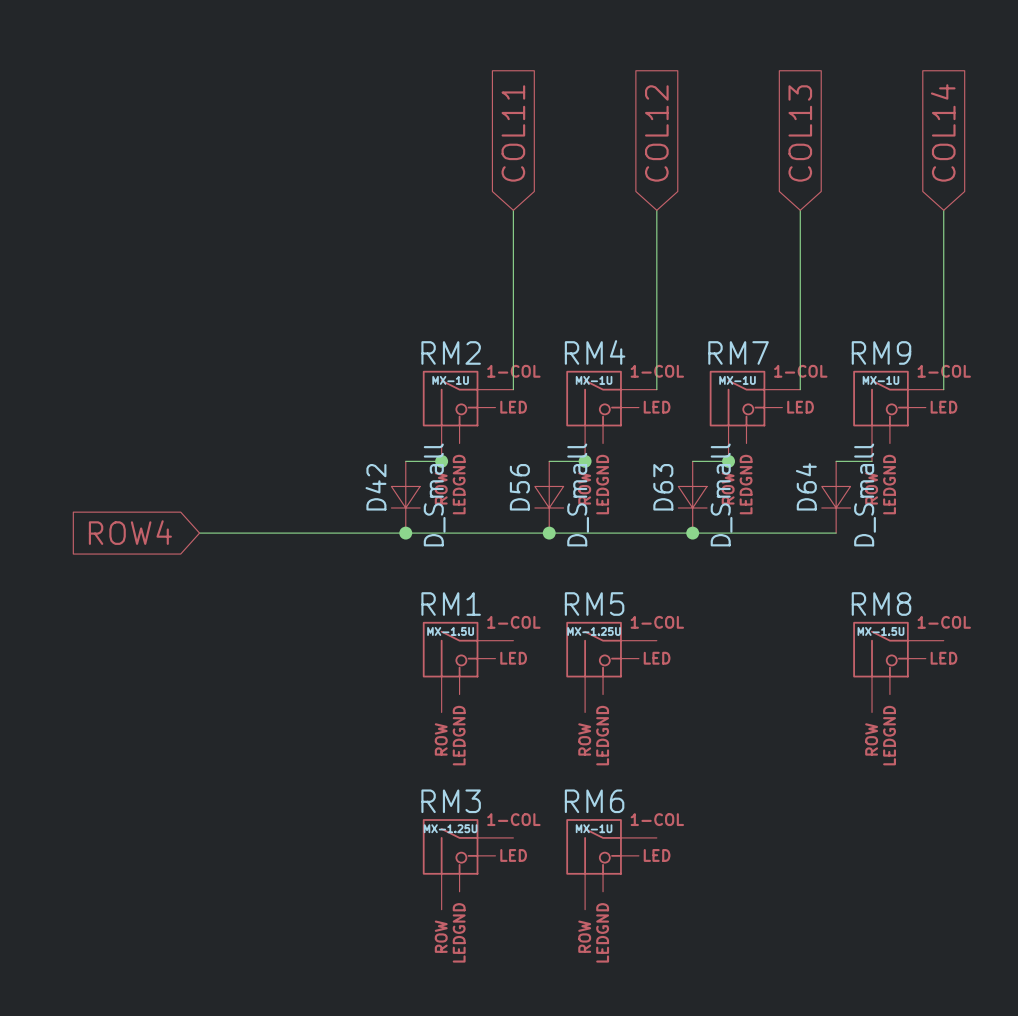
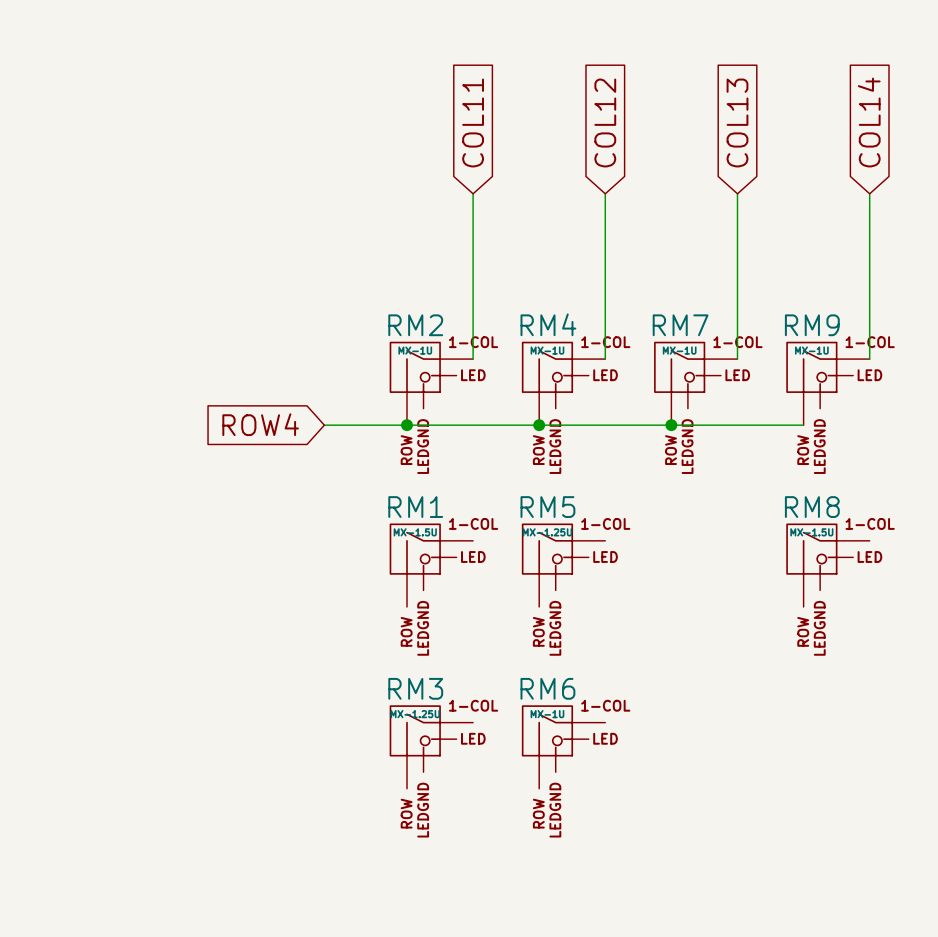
wire: none -> (324, 425) (373, 425)
wire: none -> (406, 425) (506, 425)
wire: none -> (539, 425) (638, 425)
wire: none -> (671, 425) (770, 425)
D42: D_Small (405, 497) -> none
D56: D_Small (549, 497) -> none
D63: D_Small (692, 497) -> none
D64: D_Small (836, 497) -> none
global label position: ROW4 (130, 532) -> ROW4 (260, 424)
wire: (199, 533) (836, 533) -> none
junction: (405, 533) -> none
junction: (549, 533) -> none
junction: (692, 533) -> none
RM1 position: (468, 667) -> (431, 565)
RM5 position: (611, 667) -> (563, 565)
RM8 position: (898, 667) -> (827, 565)
RM3 position: (468, 864) -> (431, 747)
RM6 position: (611, 864) -> (563, 747)

